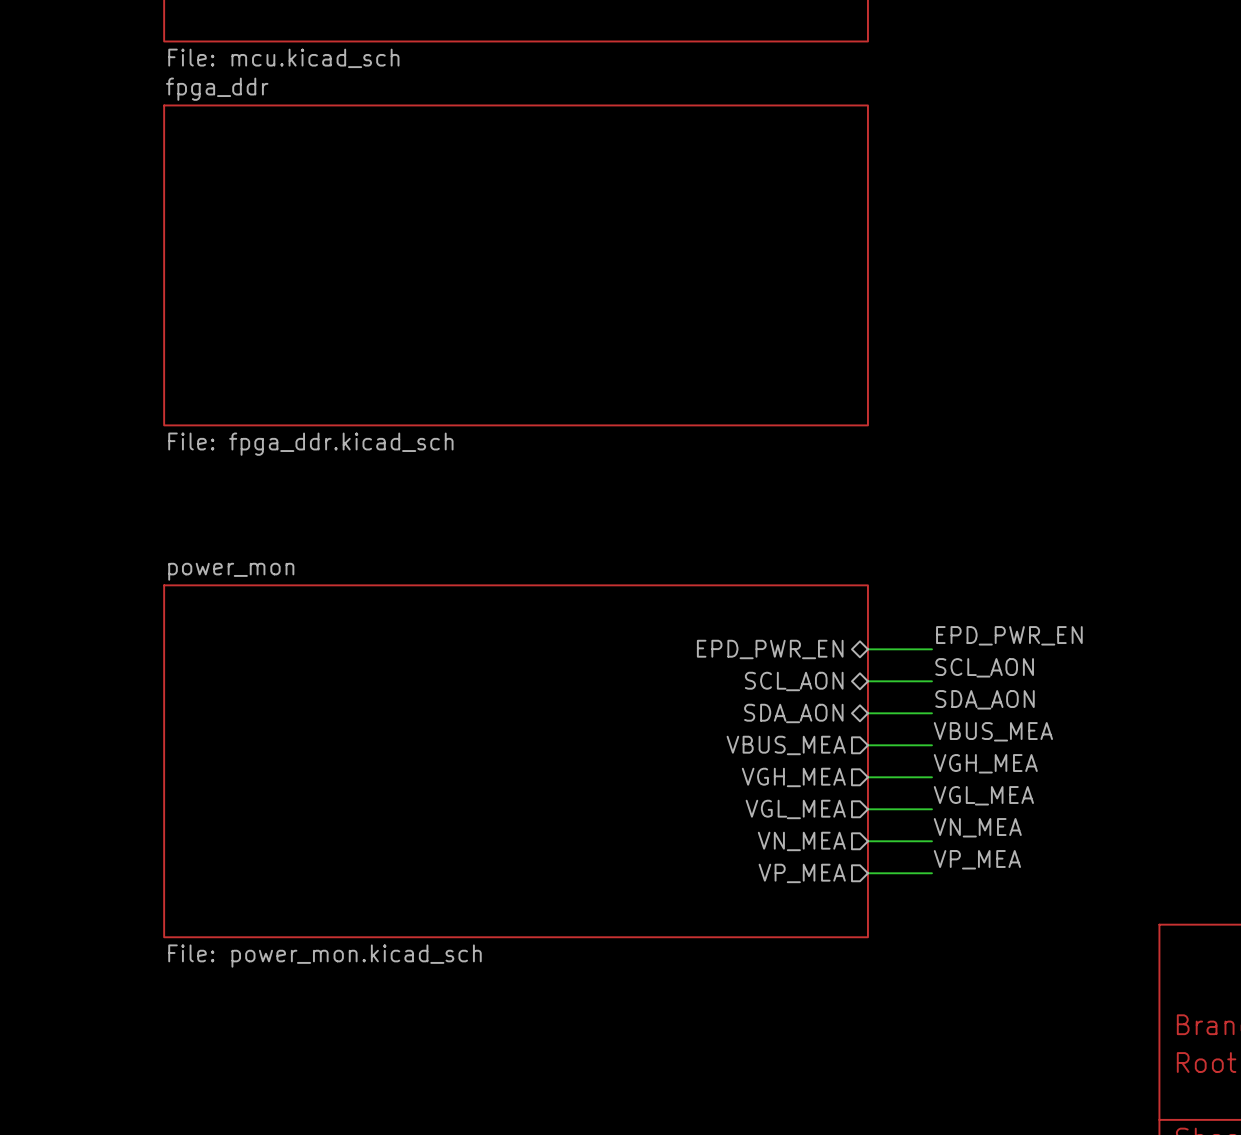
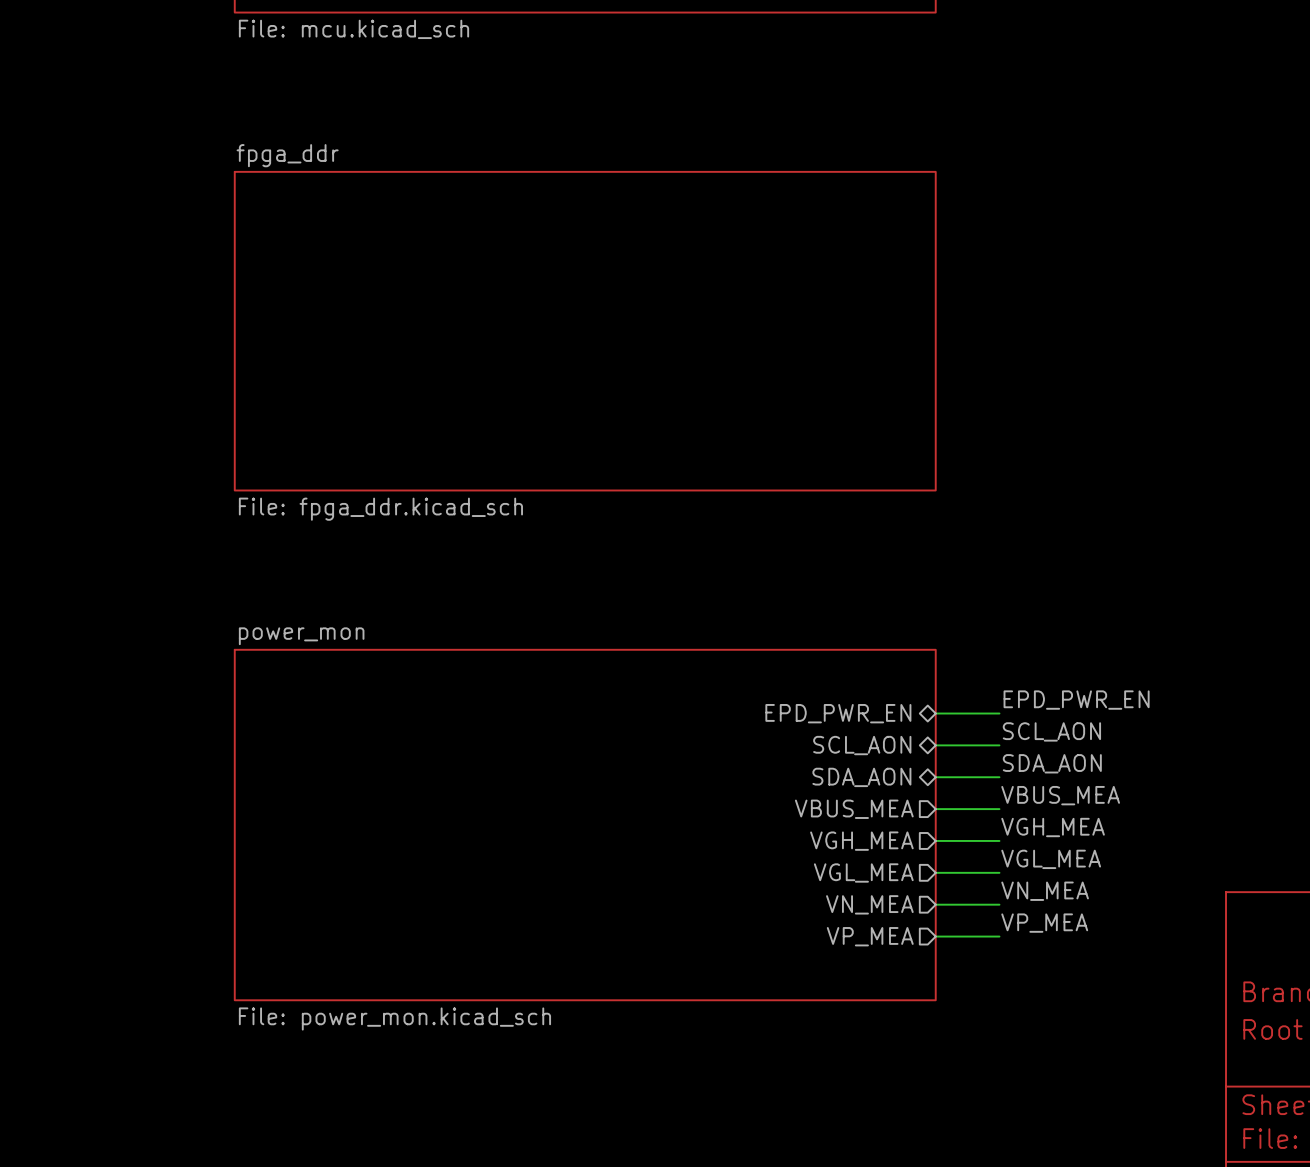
sheet fpga_ddr position: (516, 265) -> (585, 331)
label: EPD_PWR_EN (1009, 635) -> none
sheet pin: EPD_PWR_EN (770, 649) -> none
wire: (867, 649) (931, 649) -> (935, 872) (999, 872)
label: SCL_AON (984, 667) -> none
sheet pin: SCL_AON (794, 681) -> none
wire: (867, 681) (931, 681) -> (935, 904) (999, 904)
label: SDA_AON (985, 699) -> none
sheet pin: SDA_AON (793, 713) -> none
wire: (867, 713) (931, 713) -> (935, 936) (999, 936)
label: VBUS_MEA (993, 731) -> EPD_PWR_EN (1076, 700)
sheet pin shape: output (786, 745) -> bidirectional (838, 713)
sheet pin: VBUS_MEA (786, 745) -> EPD_PWR_EN (838, 713)
sheet power_mon position: (516, 761) -> (585, 825)
label: VGH_MEA (985, 763) -> SCL_AON (1051, 731)
sheet pin shape: output (793, 777) -> bidirectional (862, 745)
sheet pin: VGH_MEA (793, 777) -> SCL_AON (862, 745)
label: VGL_MEA (983, 795) -> SDA_AON (1052, 763)
sheet pin shape: output (795, 809) -> bidirectional (861, 777)
sheet pin: VGL_MEA (795, 809) -> SDA_AON (861, 777)
label: VN_MEA (977, 827) -> VBUS_MEA (1060, 795)
sheet pin: VN_MEA (801, 841) -> VBUS_MEA (854, 809)
label: VP_MEA (977, 859) -> VGH_MEA (1053, 827)
sheet pin: VP_MEA (802, 873) -> VGH_MEA (861, 841)
label: none -> VGL_MEA (1051, 859)
sheet pin: none -> VGL_MEA (863, 872)
label: none -> VN_MEA (1045, 891)
sheet pin: none -> VN_MEA (869, 904)
label: none -> VP_MEA (1044, 923)
sheet pin: none -> VP_MEA (870, 936)

